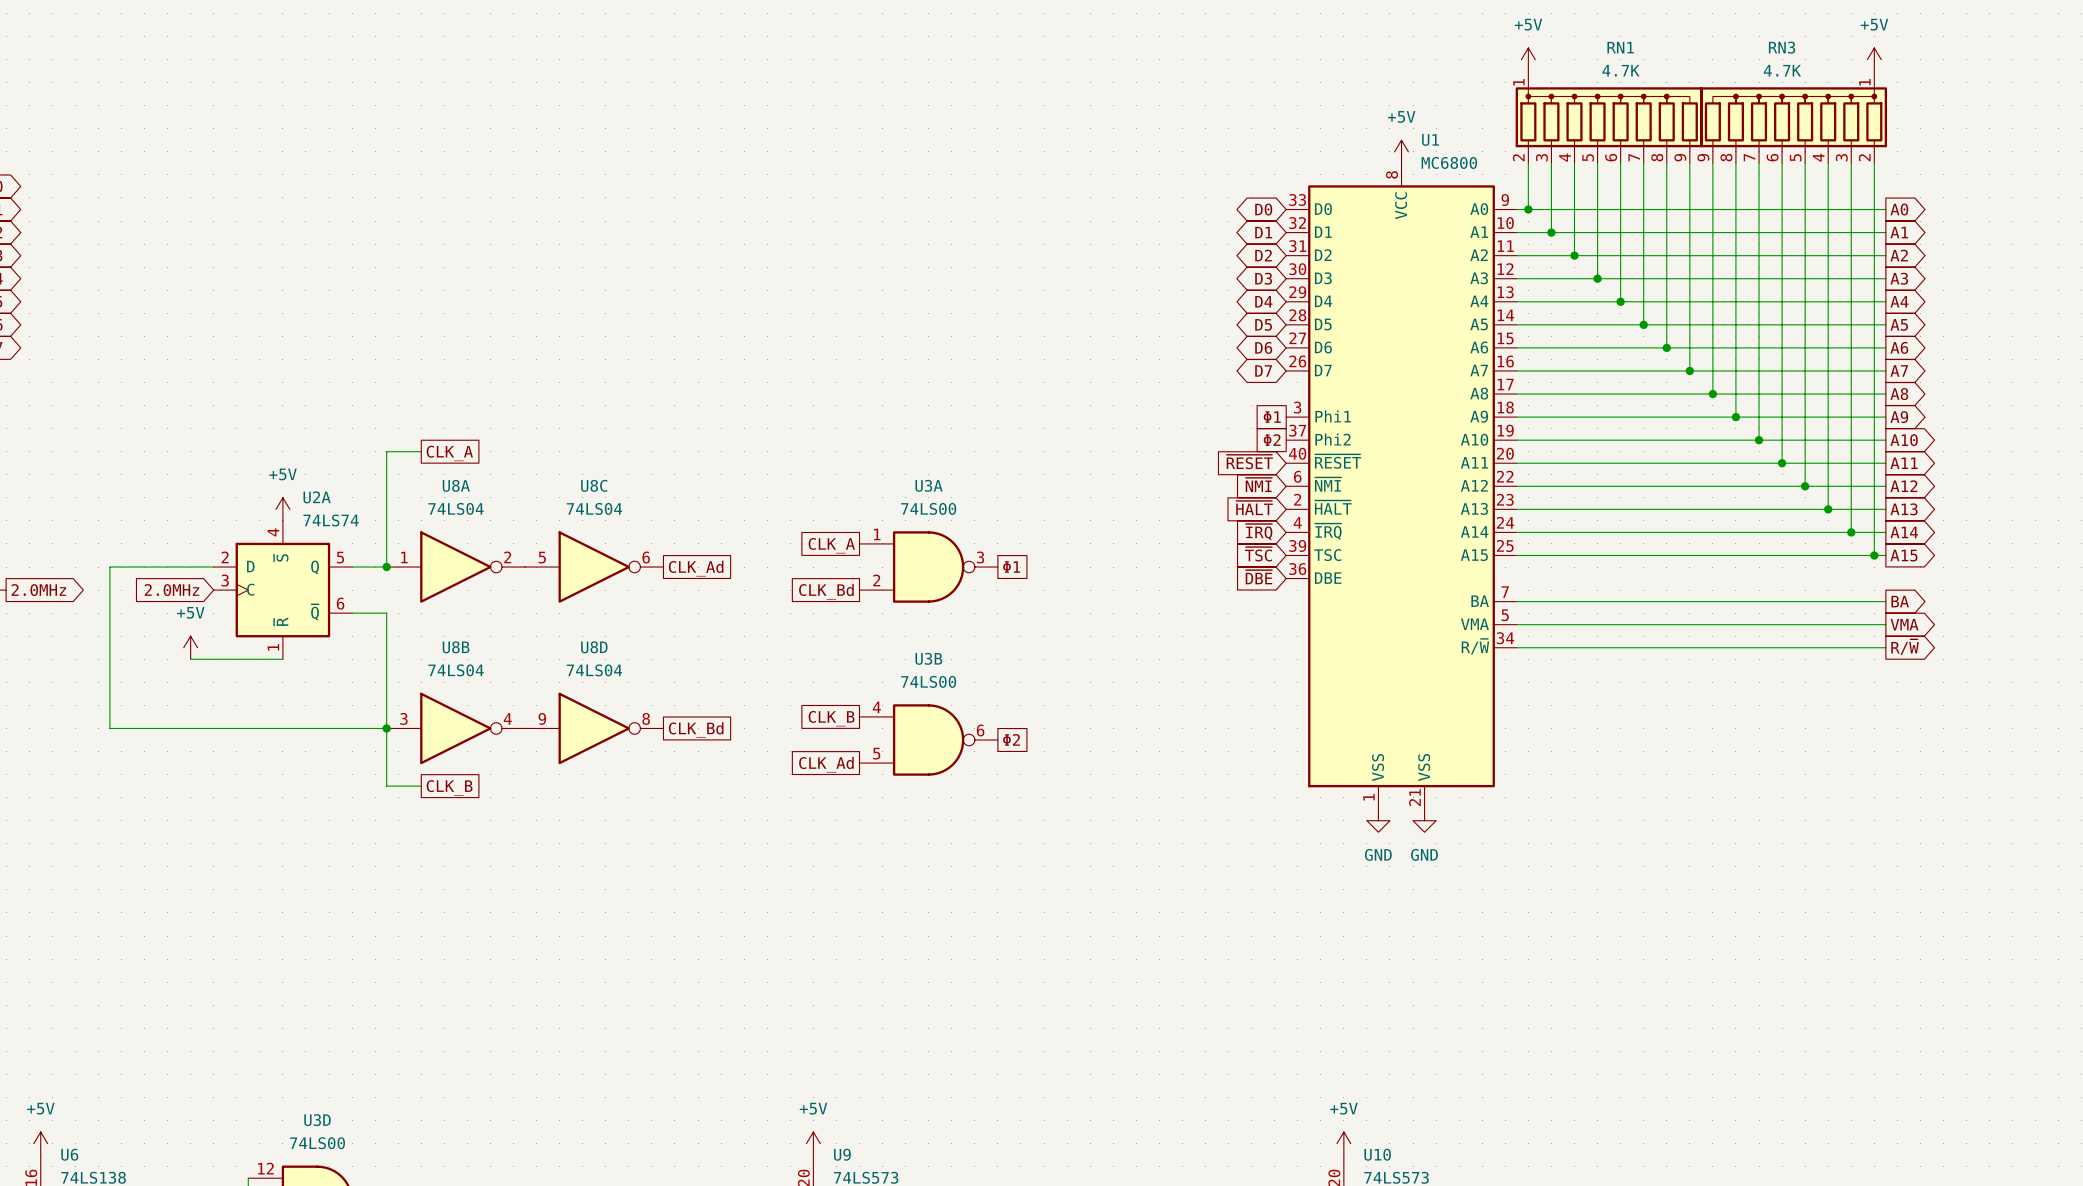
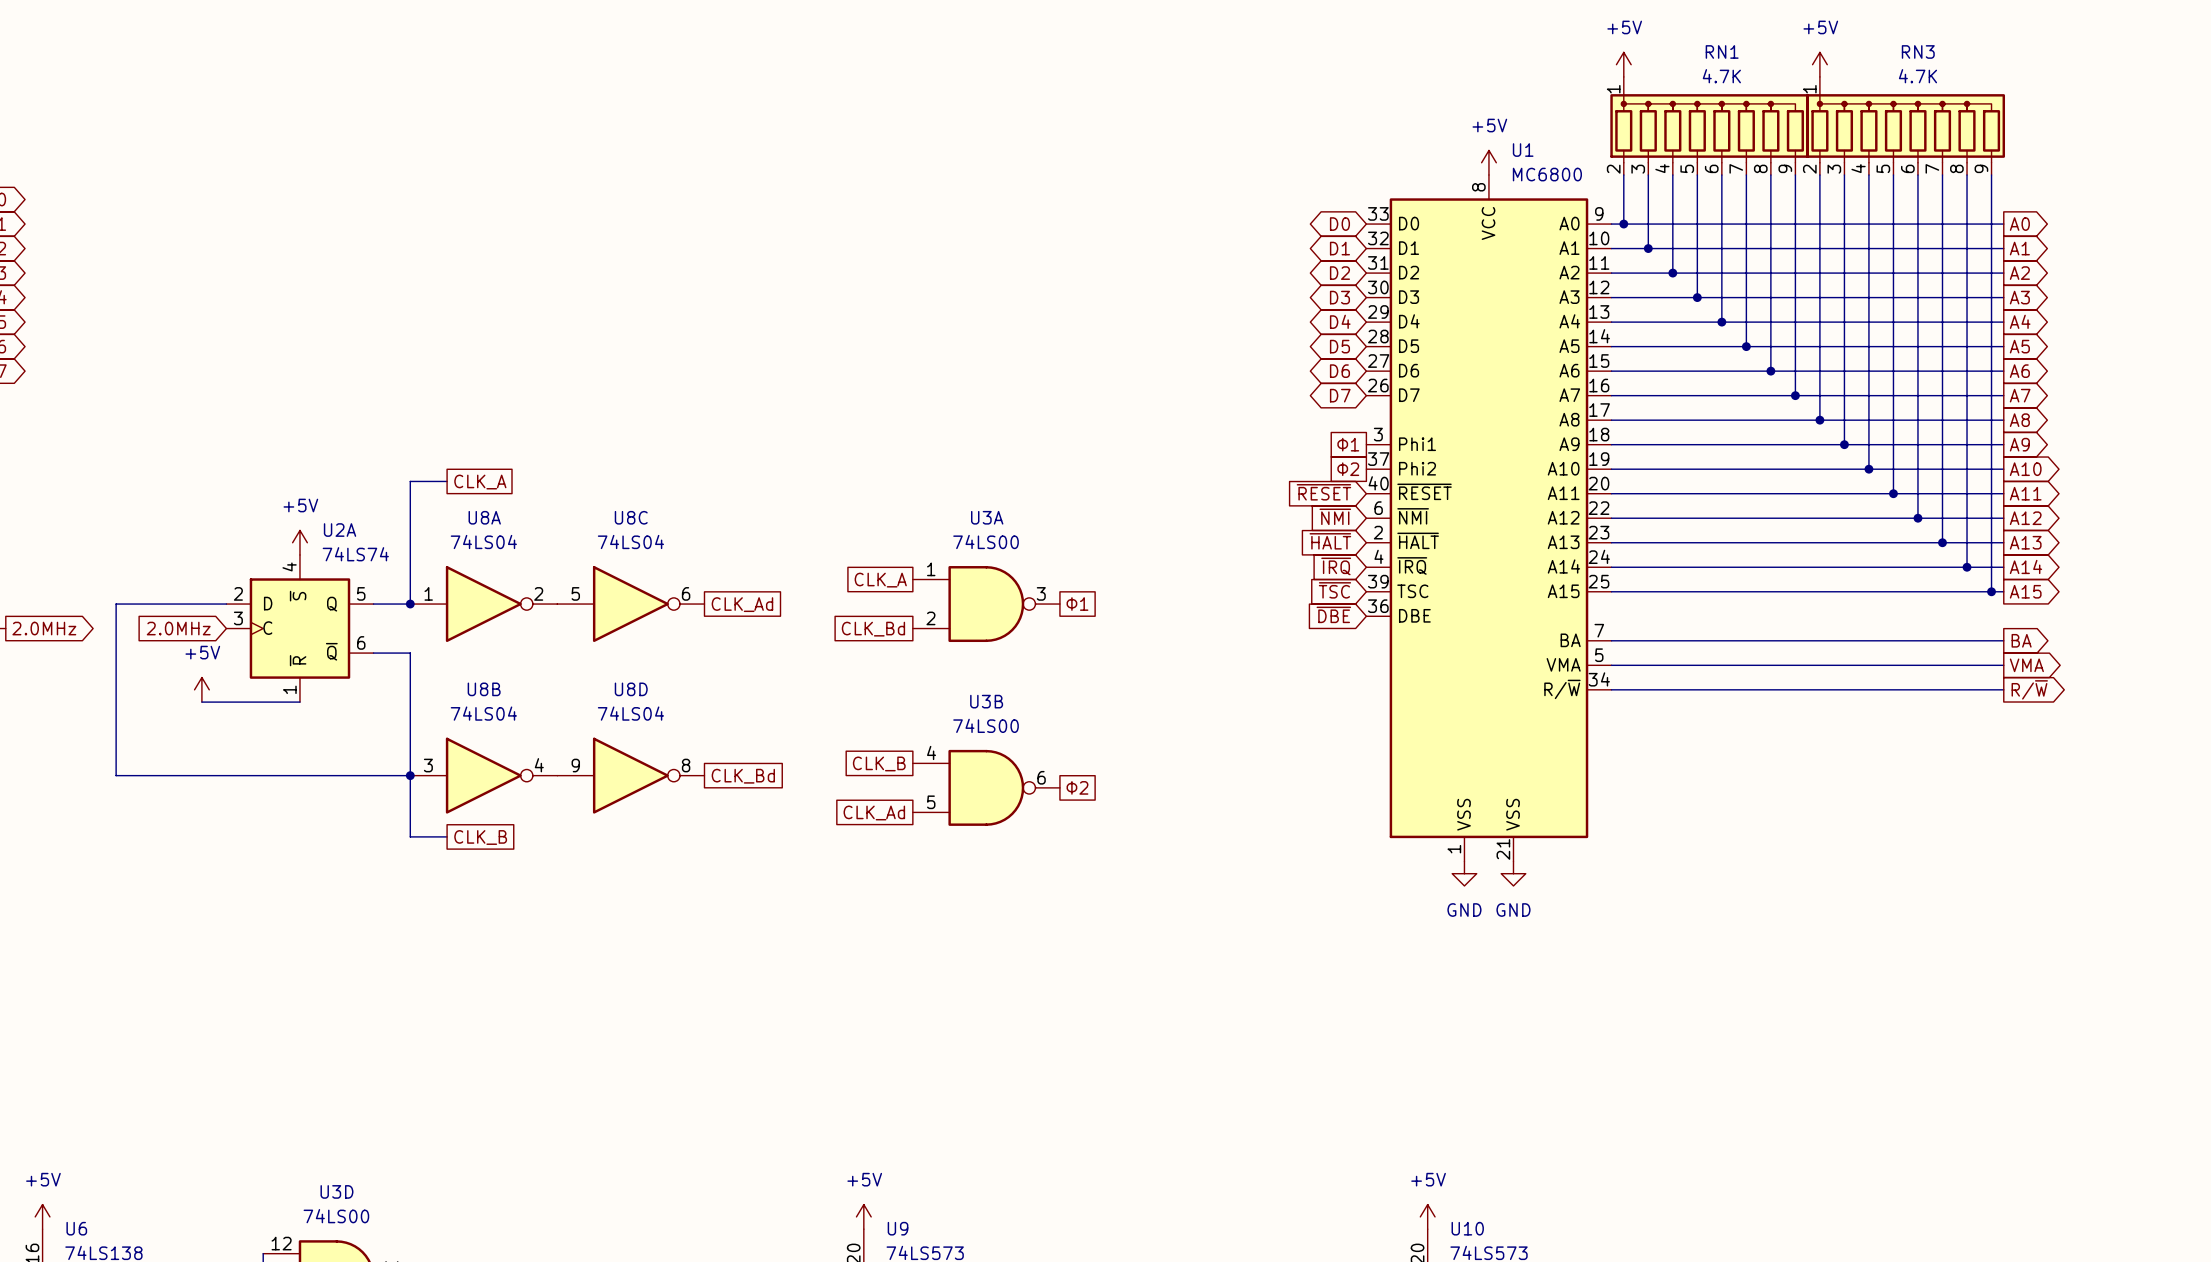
power symbol position: +5V (1874, 59) -> +5V (1819, 64)
RN3 flip: as is (1793, 119) -> left-right (1905, 128)

